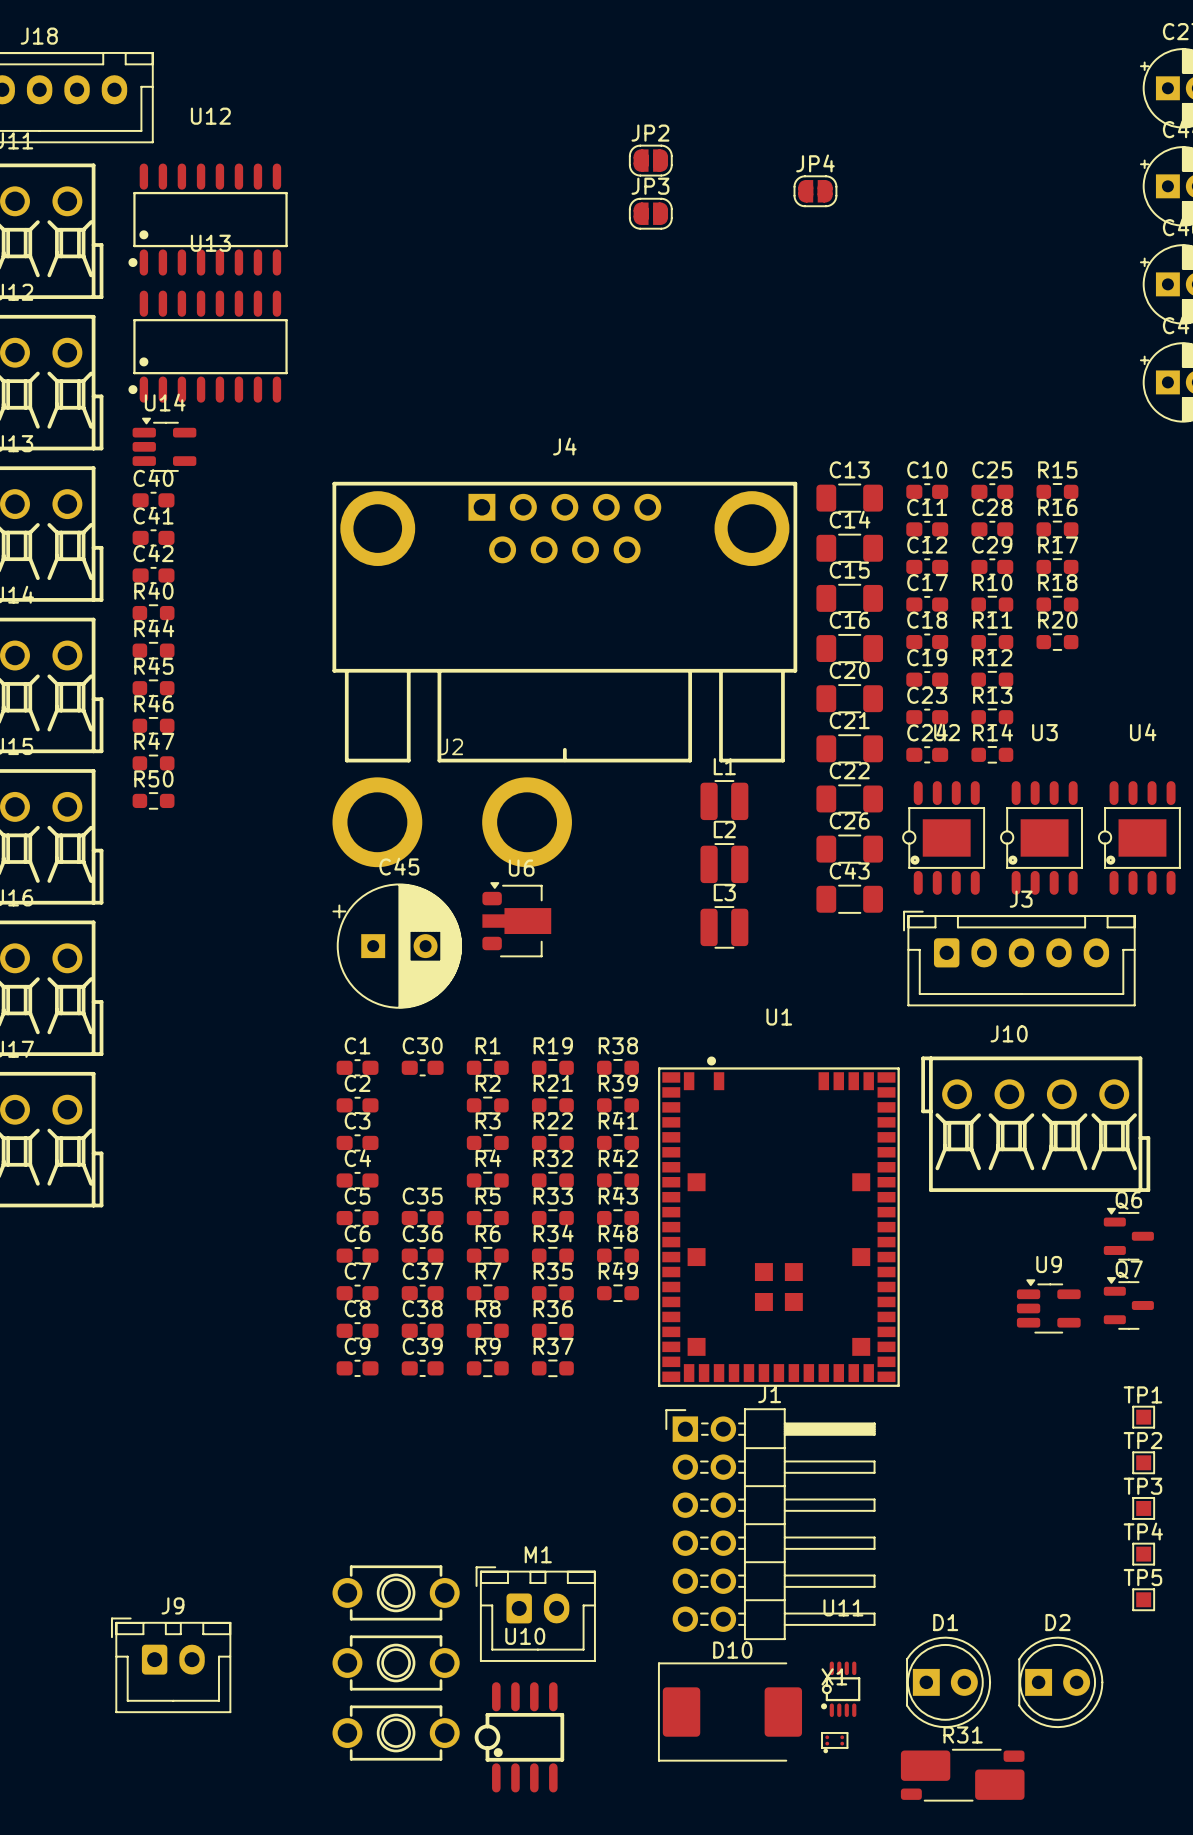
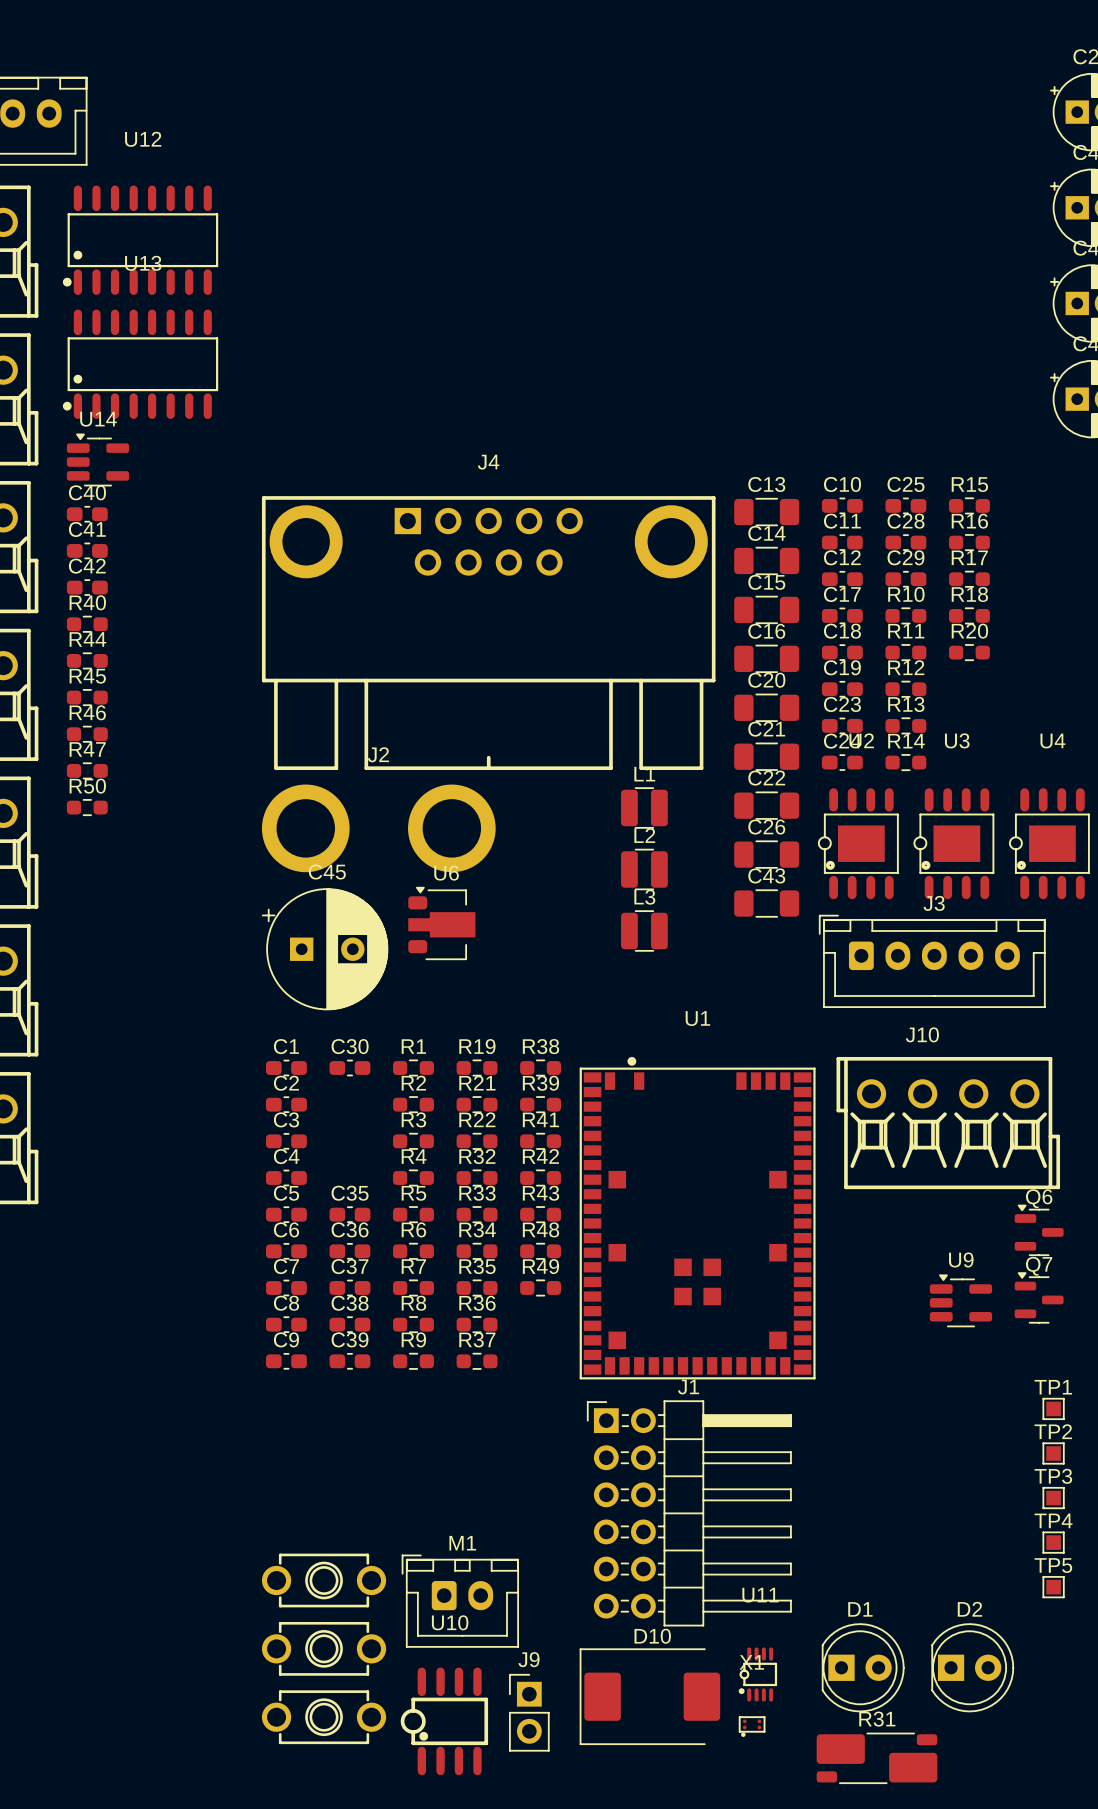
JP2: (650, 160) -> none
JP4: (815, 191) -> none
JP3: (650, 213) -> none
J9 footprint: [111, 1617, 232, 1714] -> [509, 1673, 550, 1752]

